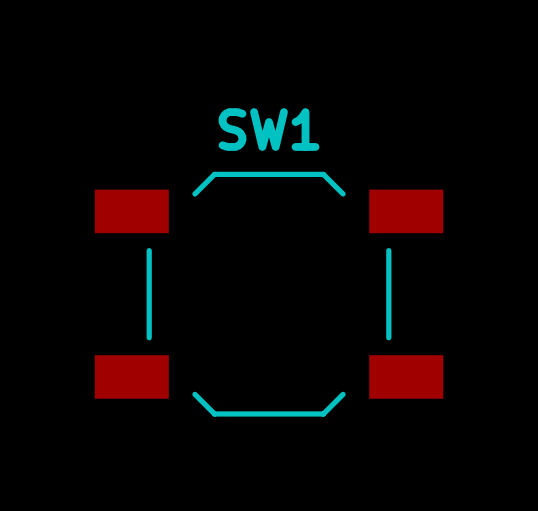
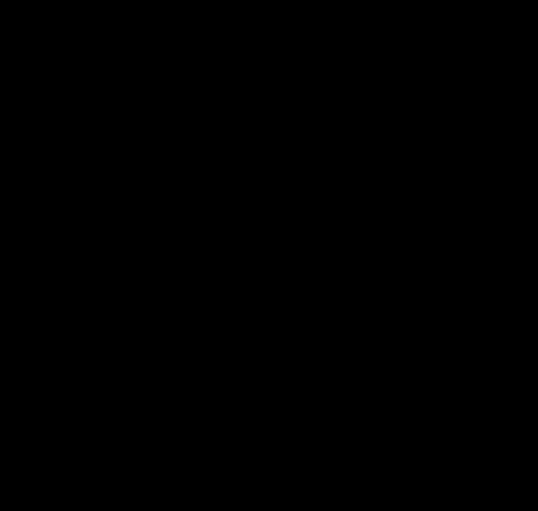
SW1: (269, 294) -> none

